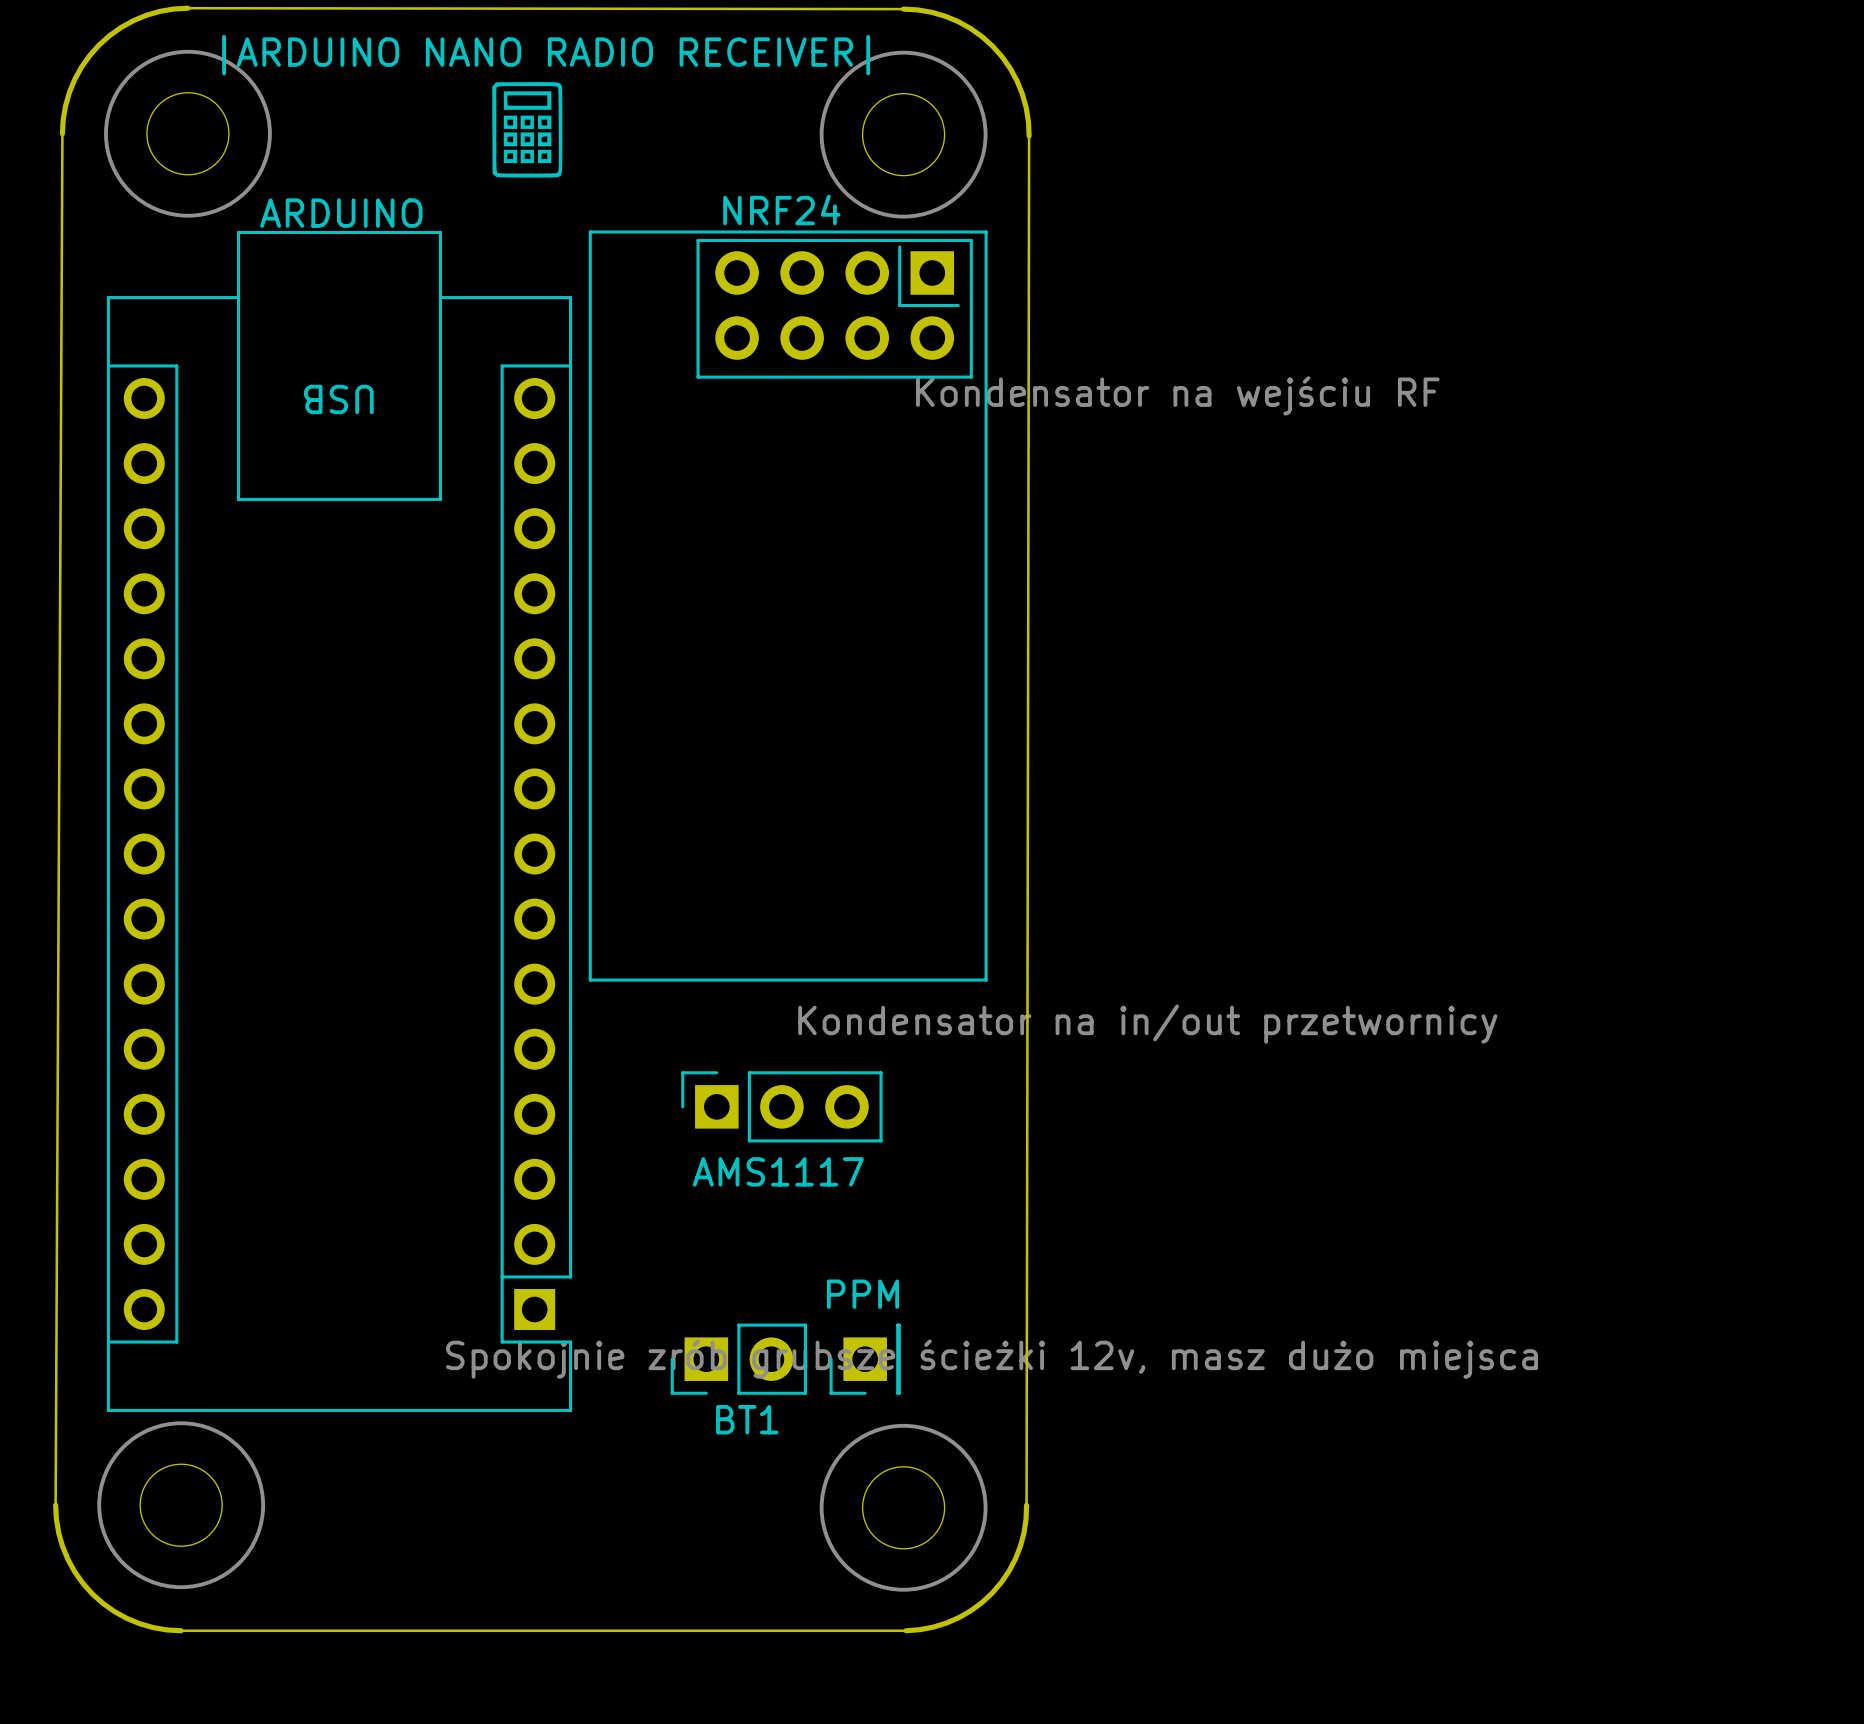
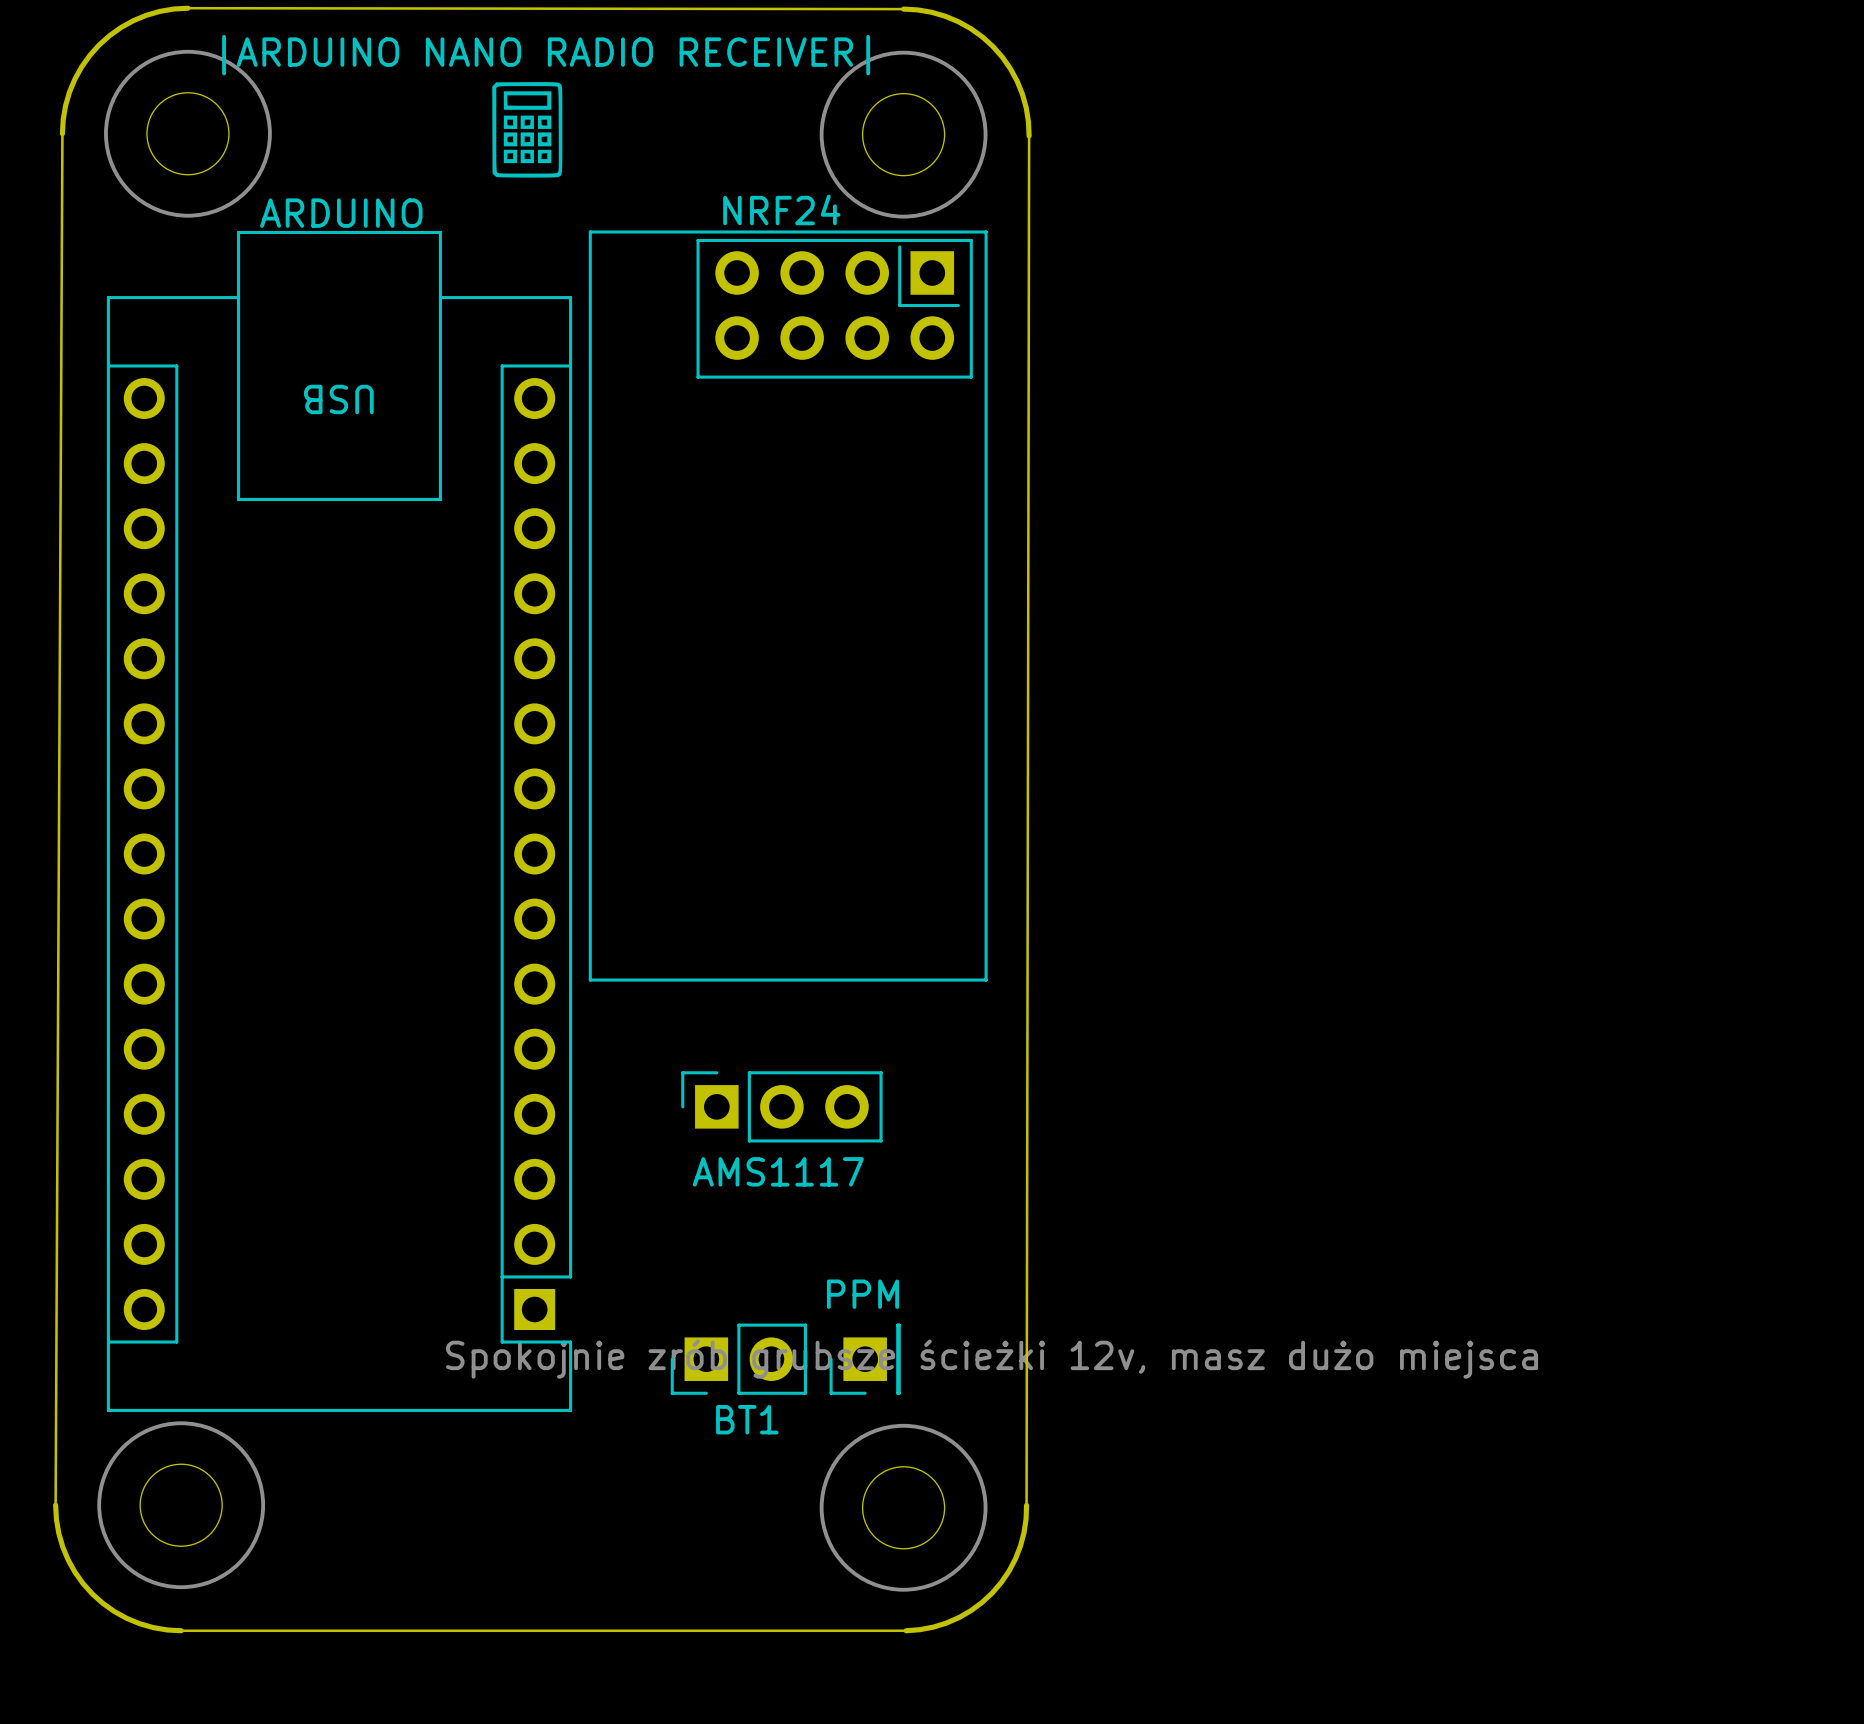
text: Kondensator na wejściu RF (1177, 395) -> none
text: Kondensator na in/out przetwornicy (1147, 1024) -> none

